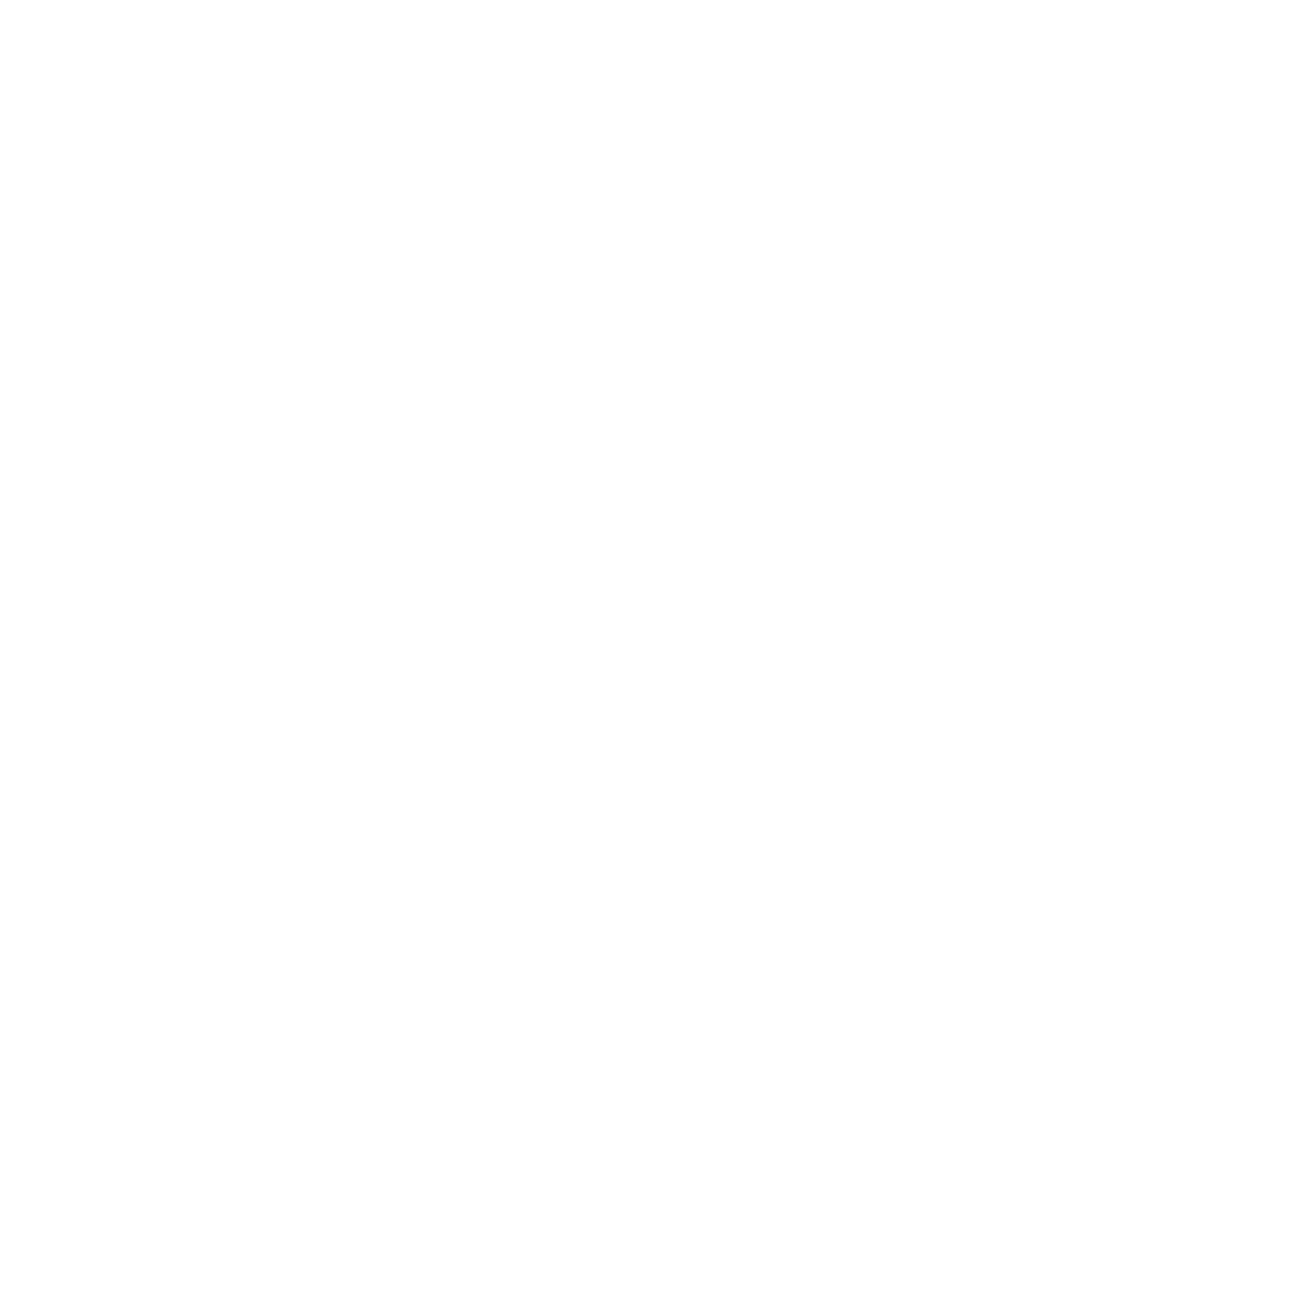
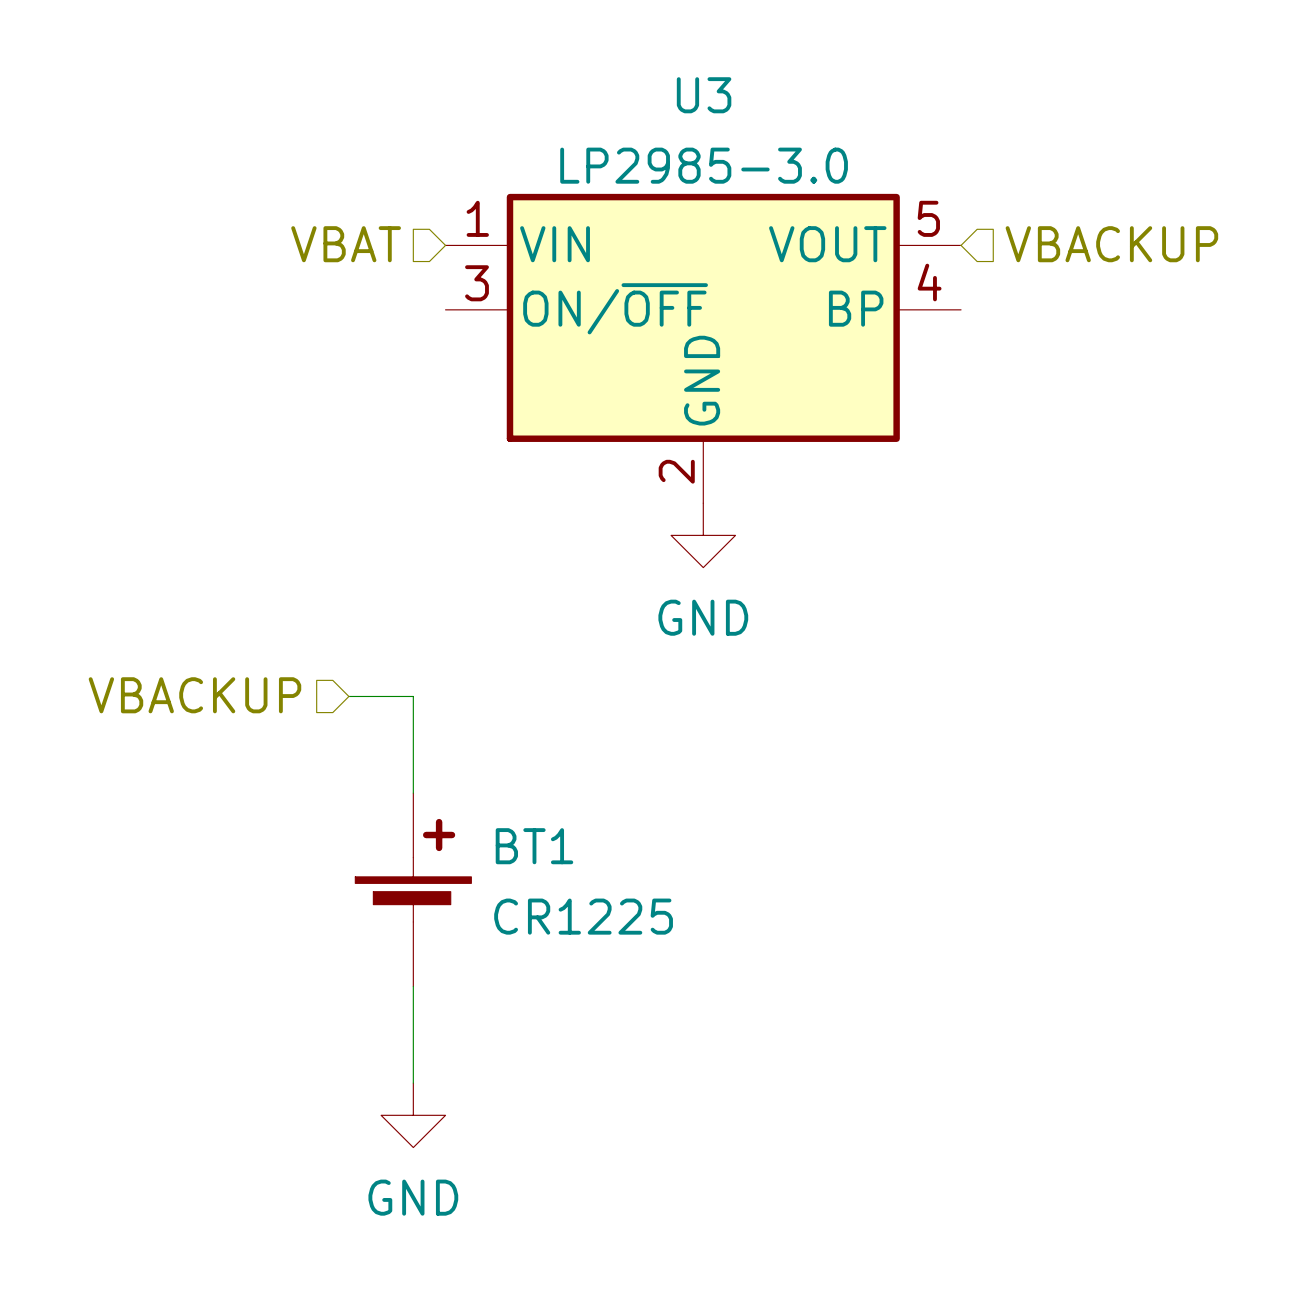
hierarchical label: none -> VBAT (346, 244)
hierarchical label: none -> VBACKUP (1111, 244)
U3: none -> LP2985-3.0 (703, 348)
power symbol: none -> GND (703, 535)
hierarchical label: none -> VBACKUP (194, 695)
wire: none -> (348, 696) (413, 696) (413, 793)
BT1: none -> CR1225 (413, 889)
wire: none -> (413, 986) (413, 1083)
power symbol: none -> GND (413, 1115)

